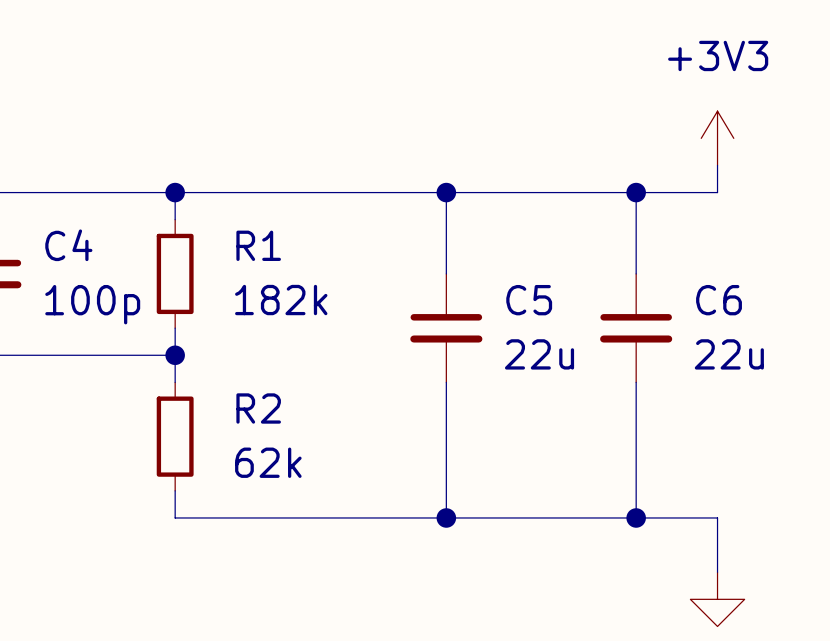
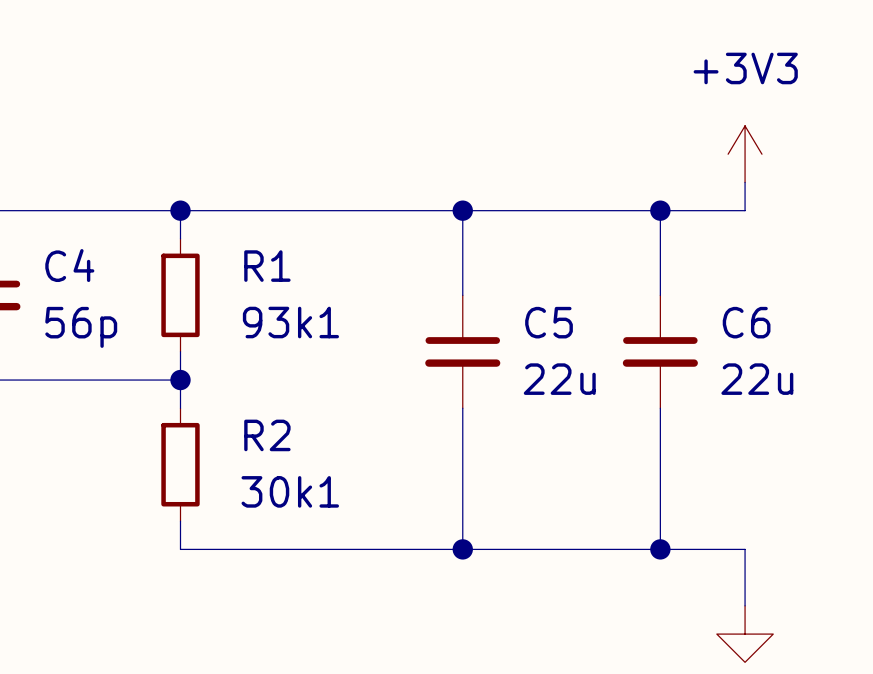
R1 value: 182k (281, 300) -> 93k1 (290, 322)
C4 value: 100p (92, 304) -> 56p (81, 327)
R2 value: 62k (268, 462) -> 30k1 (290, 491)

